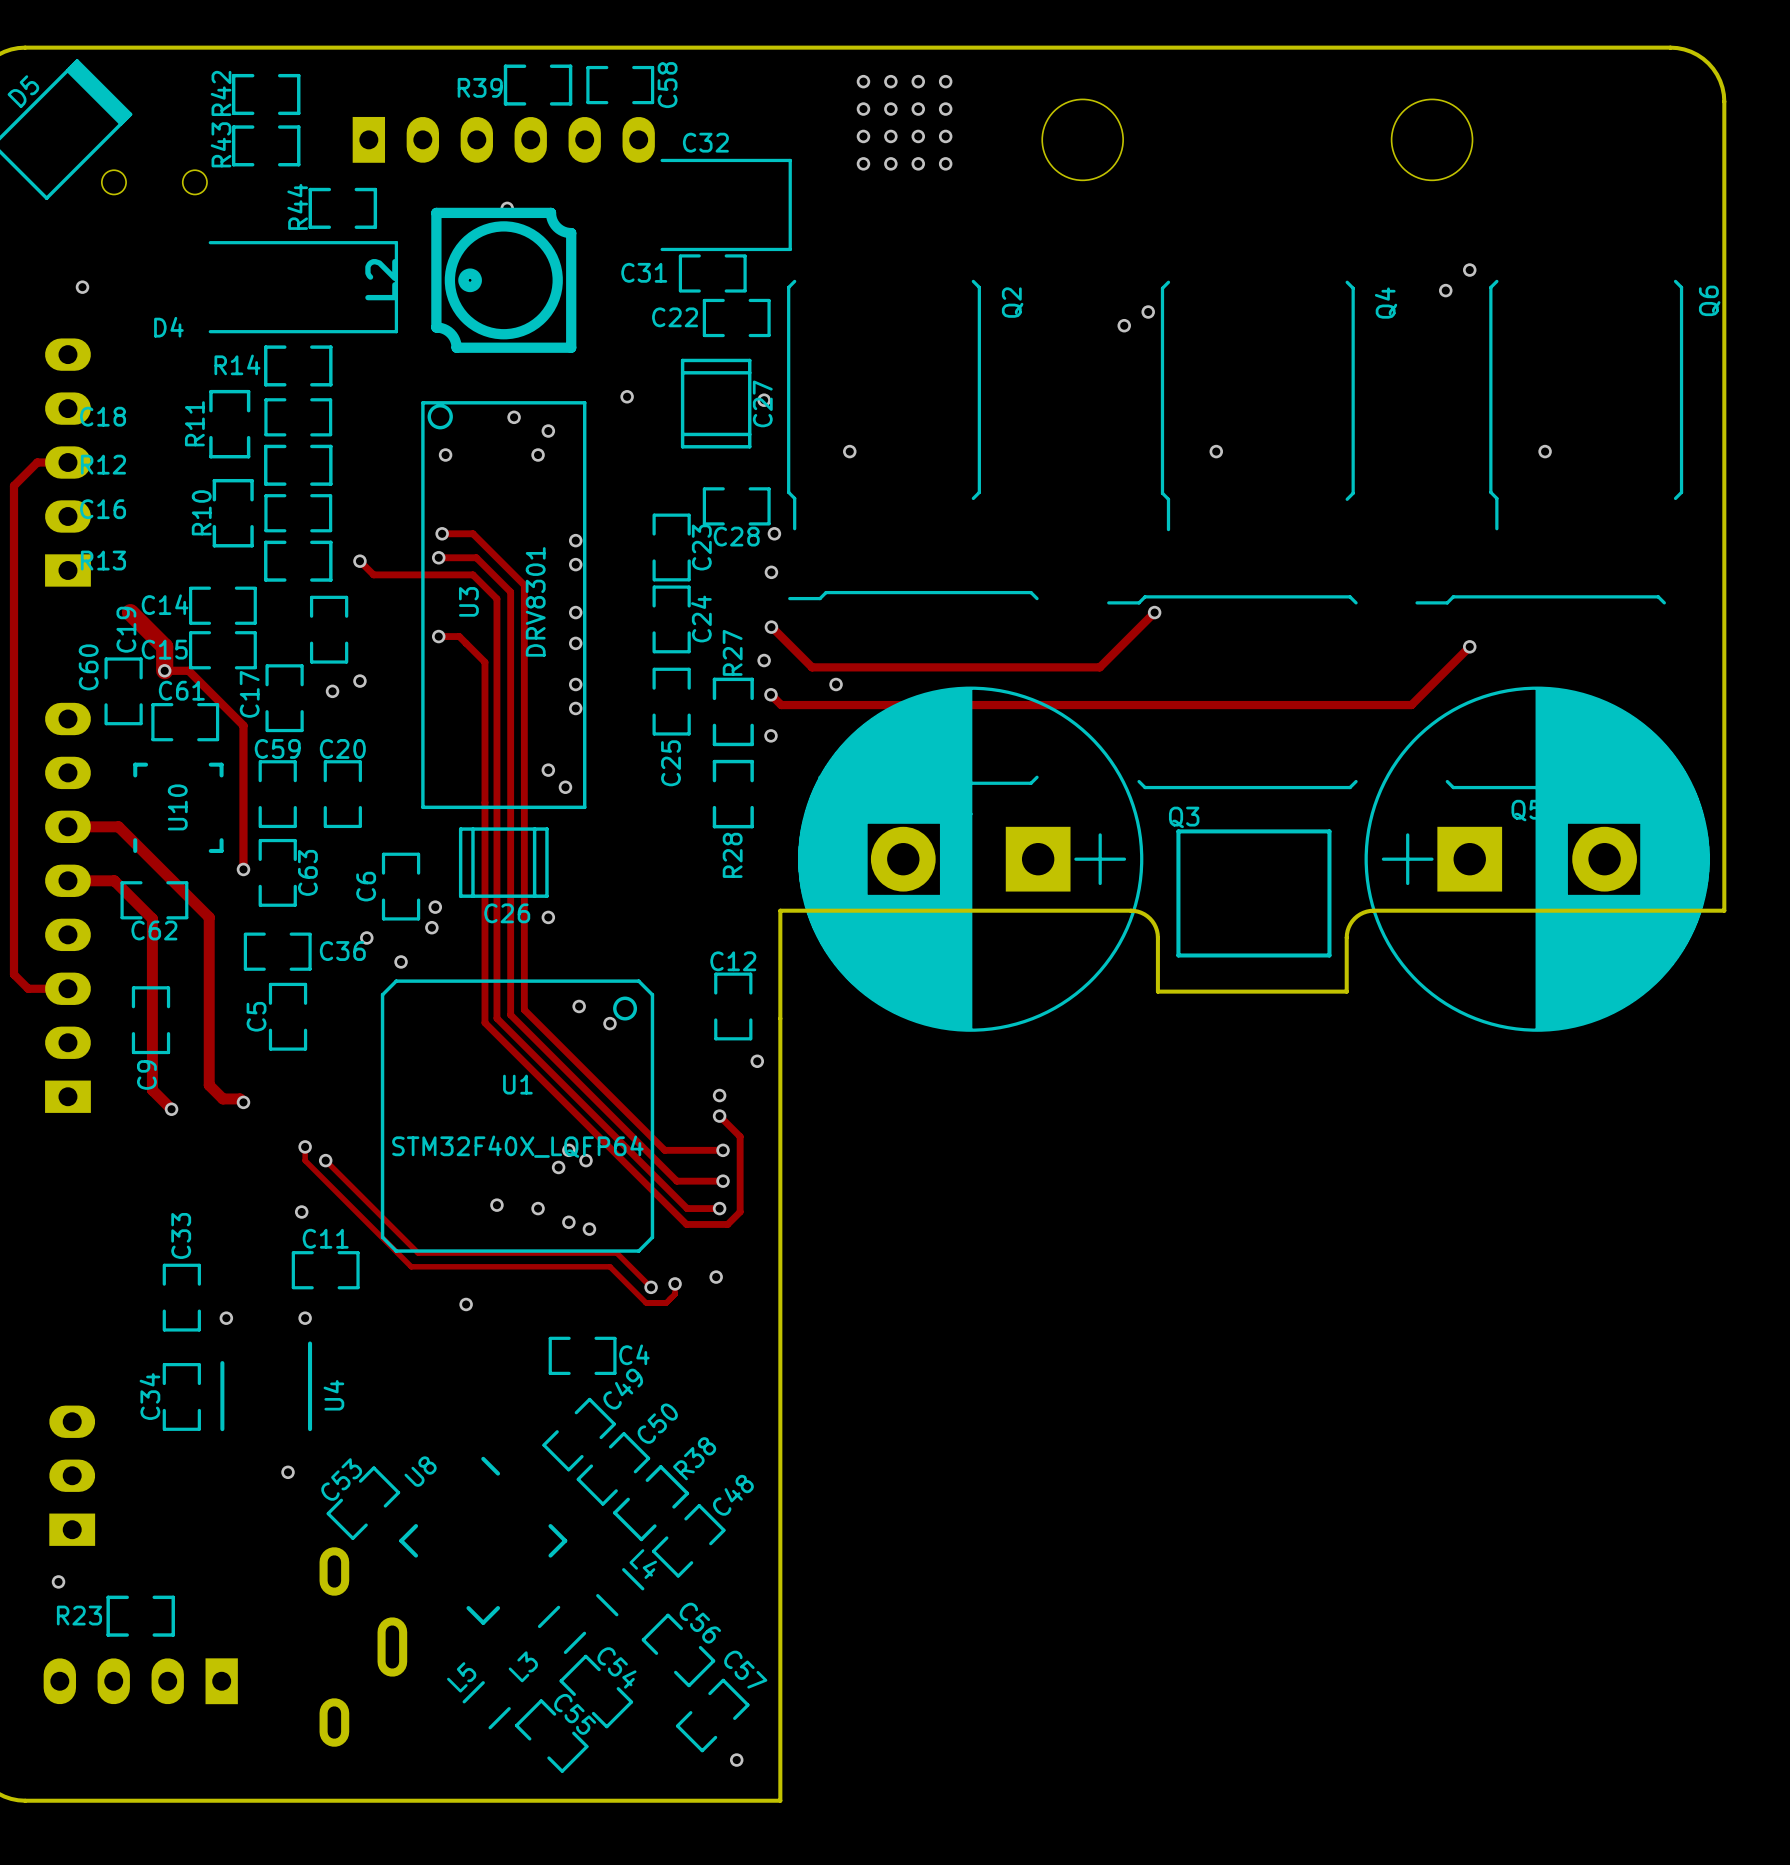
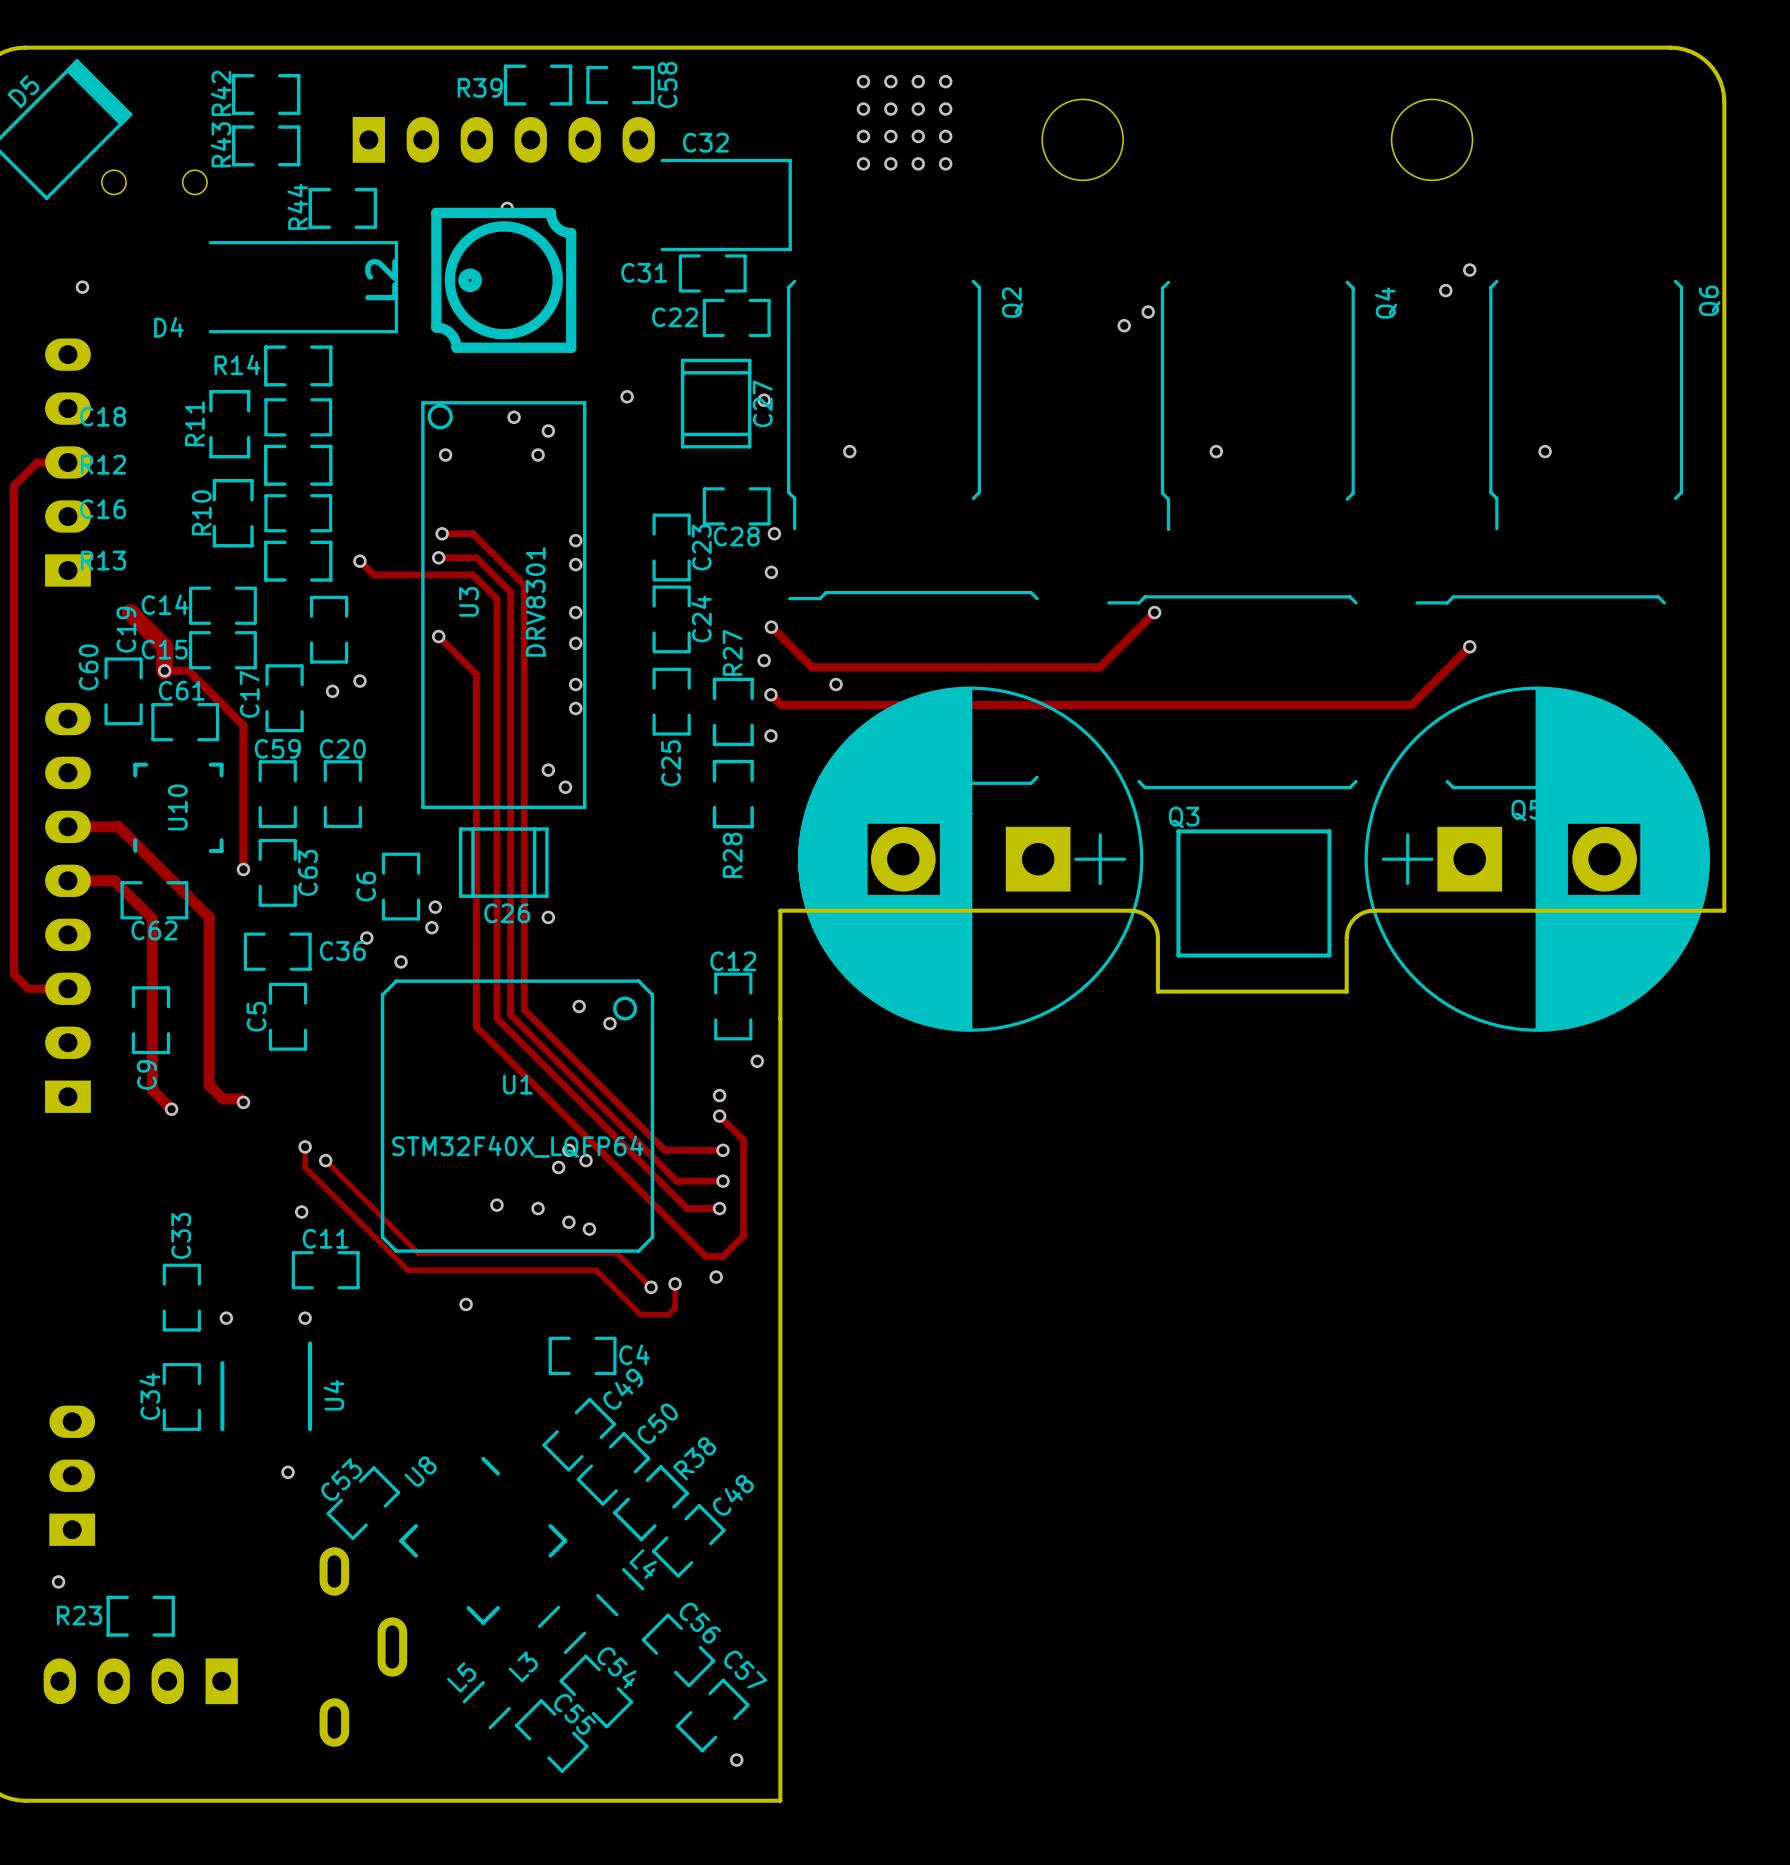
track: (438, 636) (459, 636) (484, 662) (484, 1022) (686, 1224) (727, 1224) (740, 1211) (740, 1136) -> (438, 636) (476, 674) (476, 1027) (705, 1256) (723, 1256) (743, 1235) (743, 1140) (740, 1136)
track: (305, 1160) (411, 1266) (609, 1266) (645, 1302) (666, 1302) (675, 1294) -> (305, 1160) (305, 1167) (407, 1270) (596, 1270) (640, 1314) (668, 1314) (675, 1307) (675, 1294)

